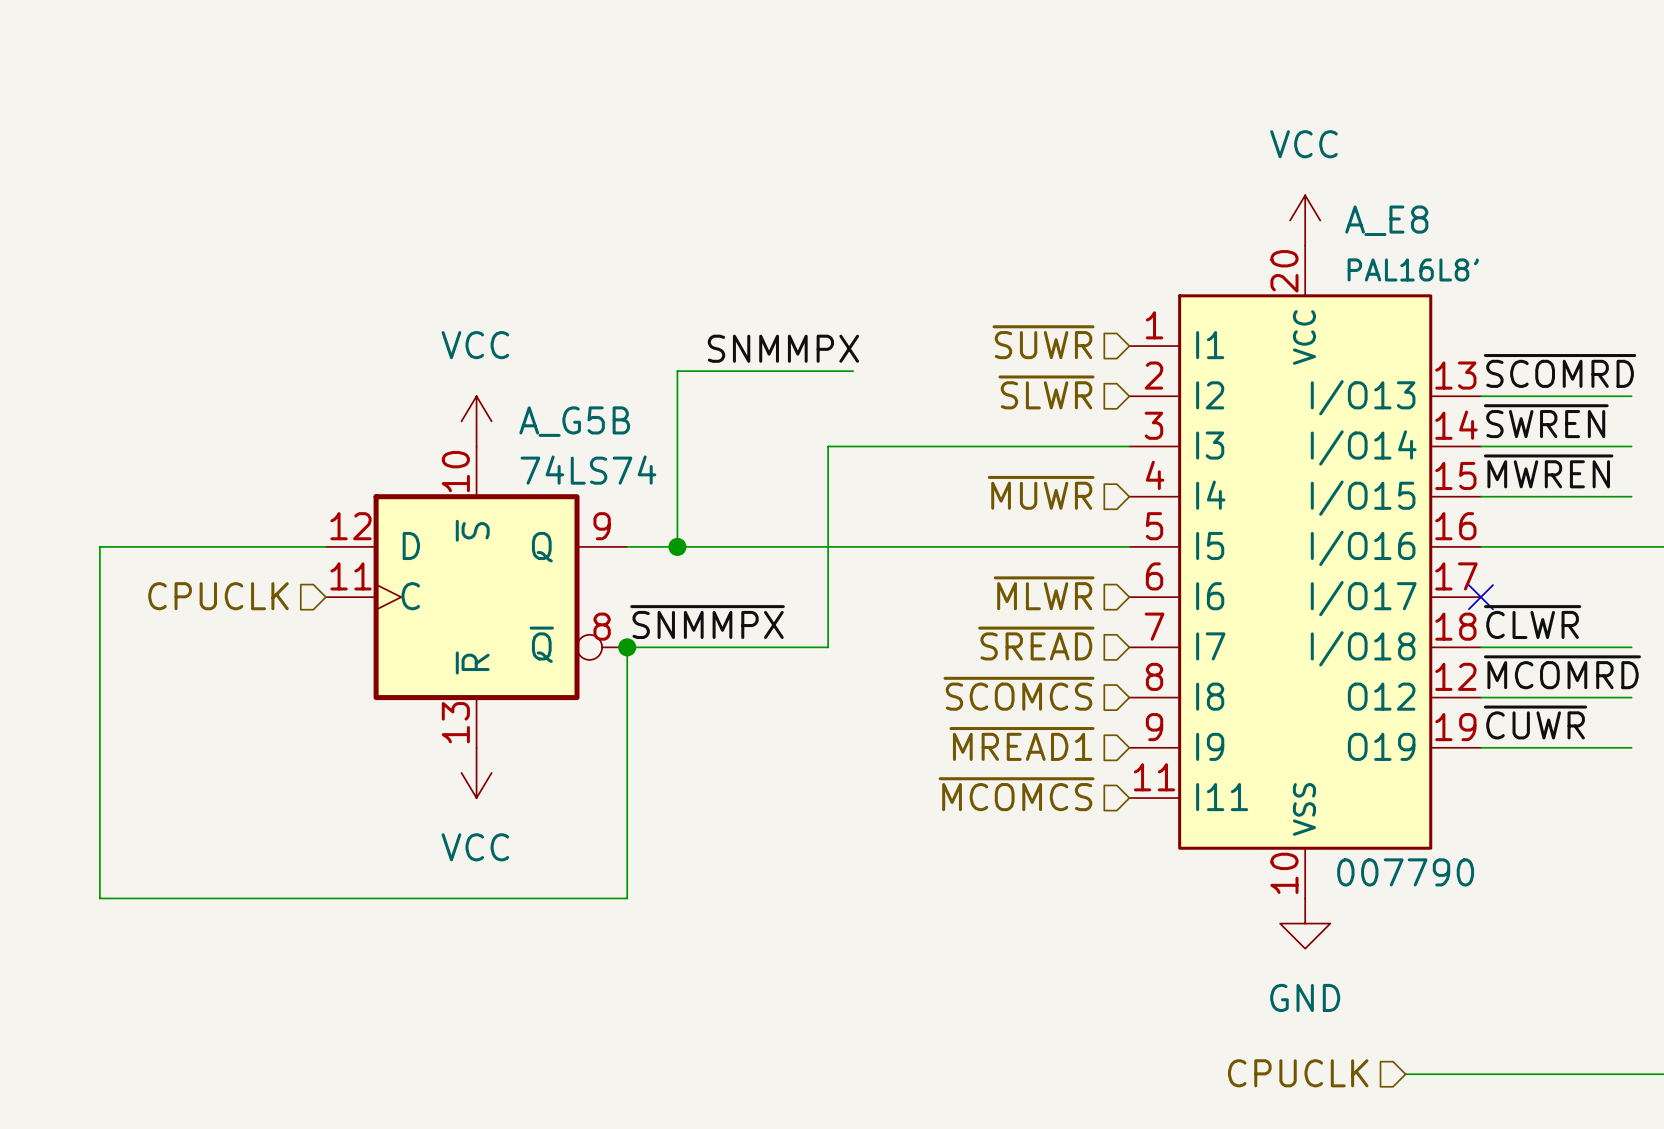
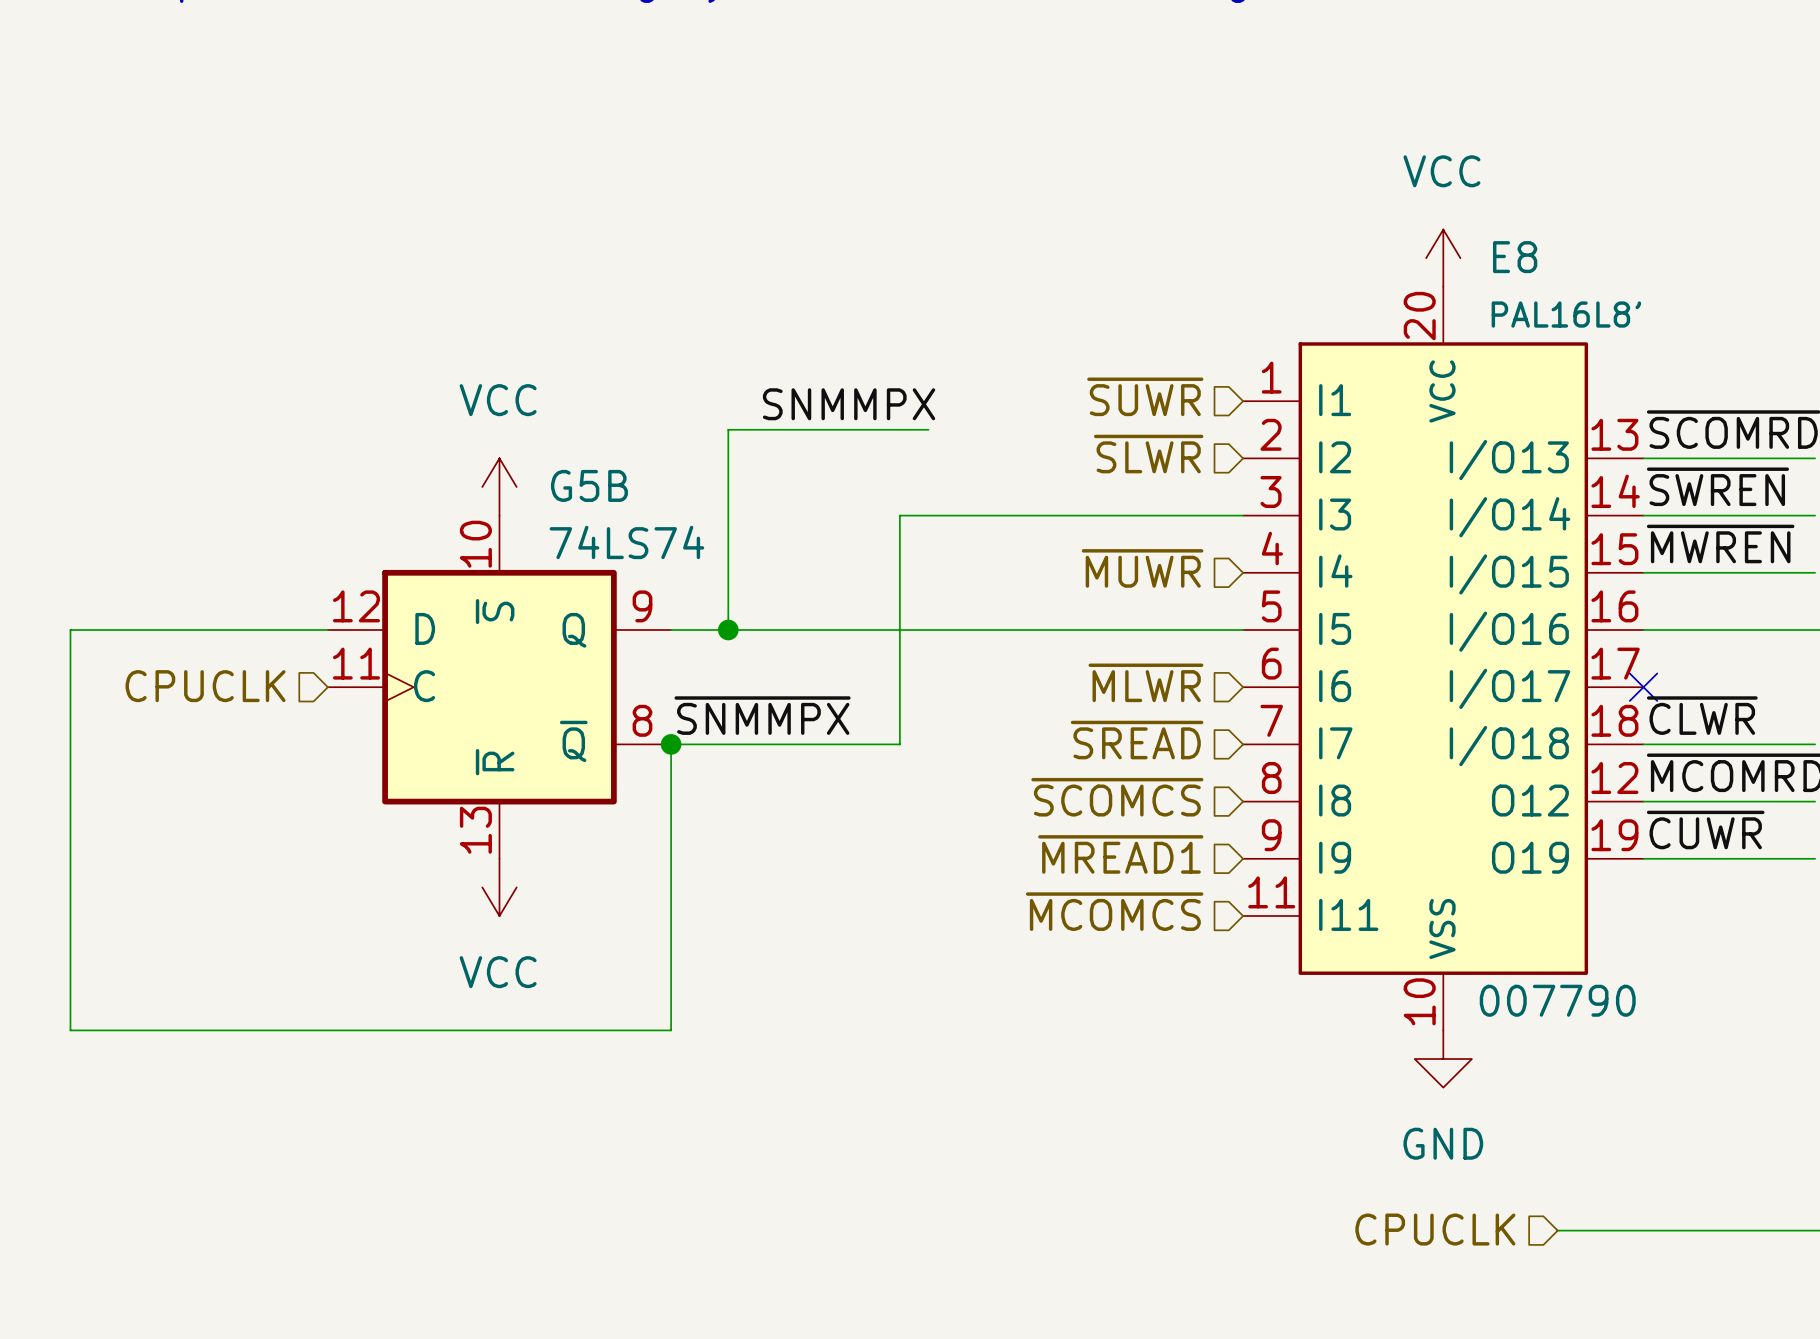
A_E8 name: A_E8 (1386, 220) -> E8 (1515, 257)
A_G5B: 74LS74 (476, 597) -> none
G5B: none -> 74LS74 (499, 687)

